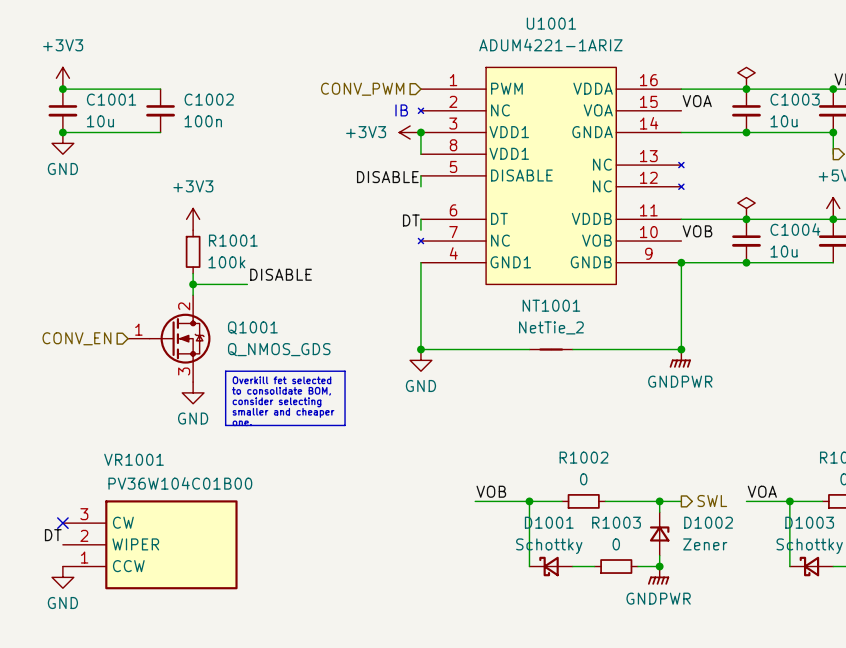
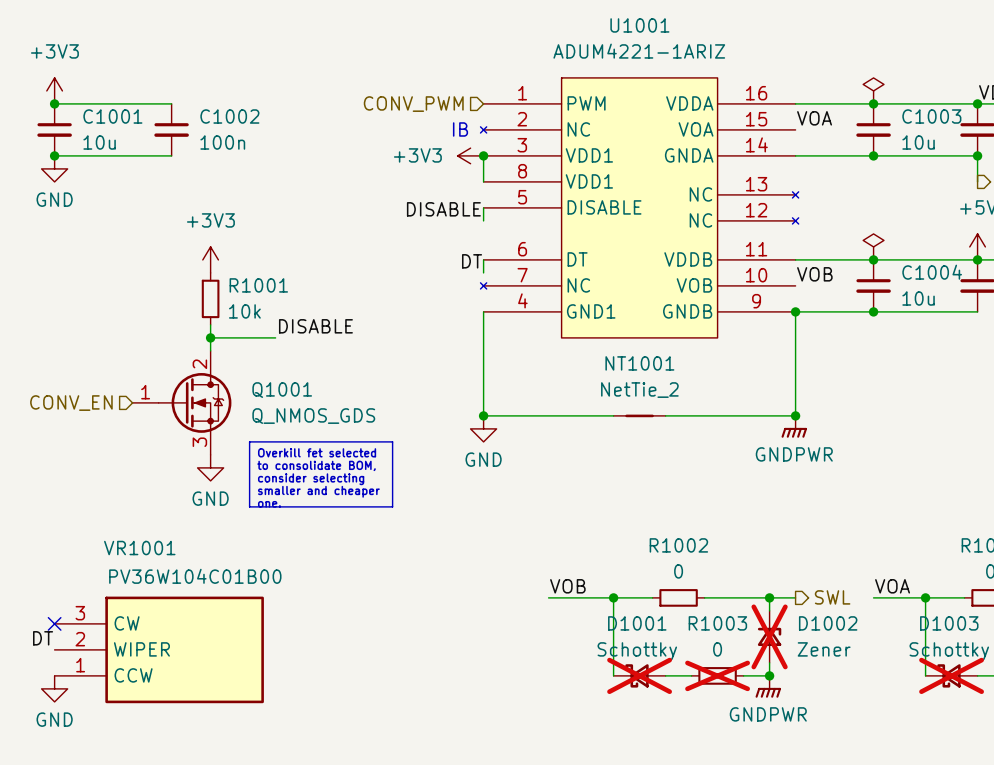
R1001 value: 100k (226, 262) -> 10k (244, 311)
D1002 do-not-place cross: none -> (769, 636)
D1001 do-not-place cross: none -> (639, 675)
R1003 do-not-place cross: none -> (717, 675)
D1003 do-not-place cross: none -> (951, 675)

